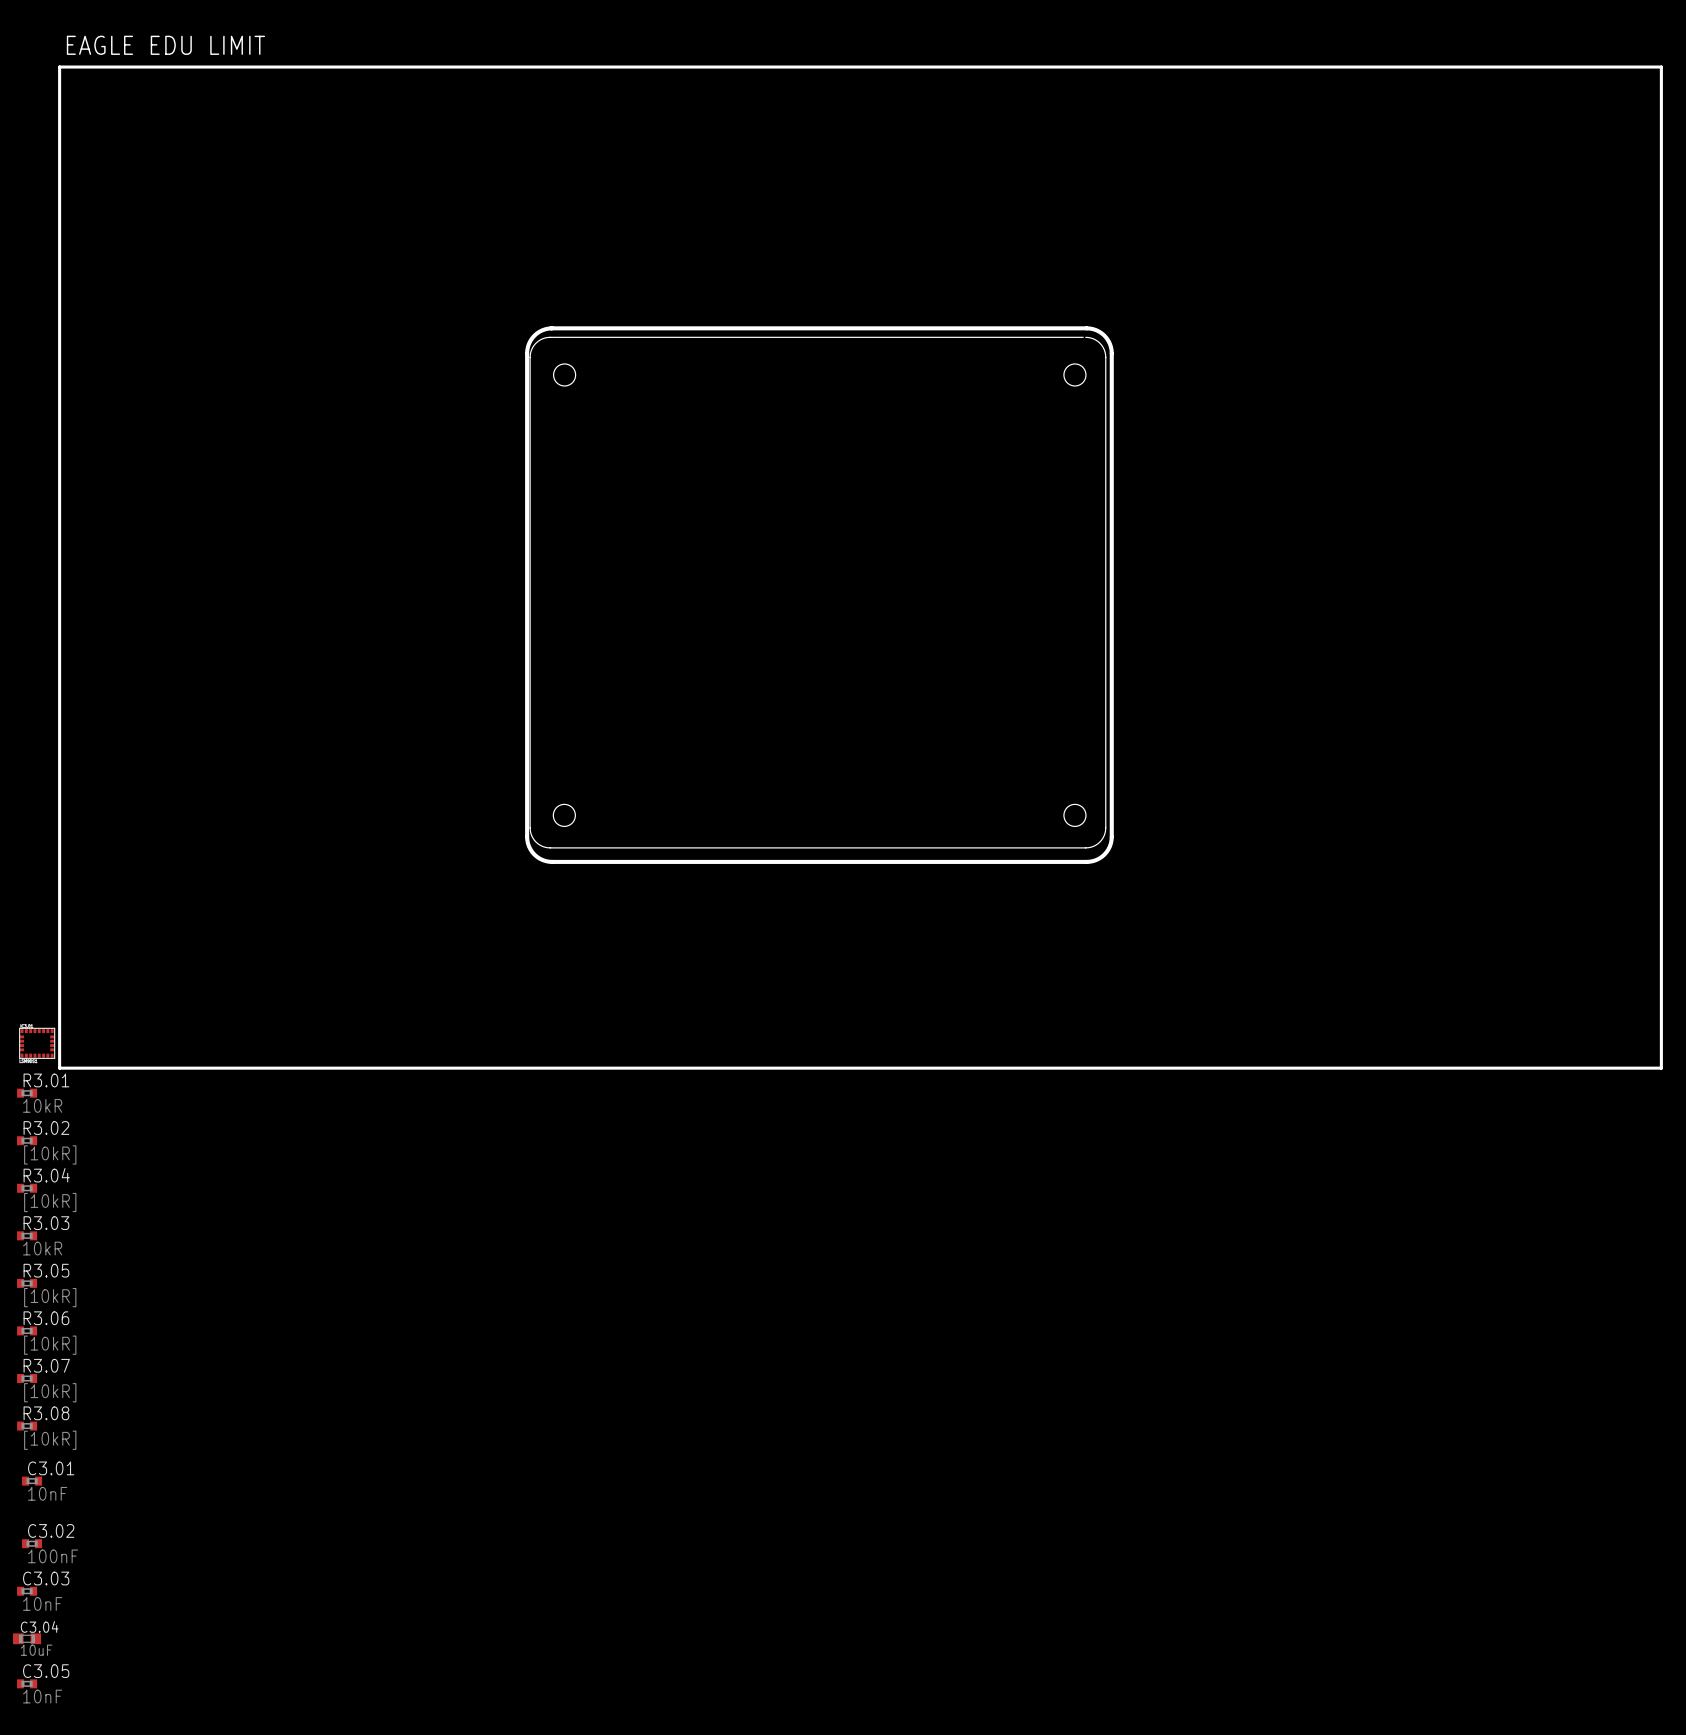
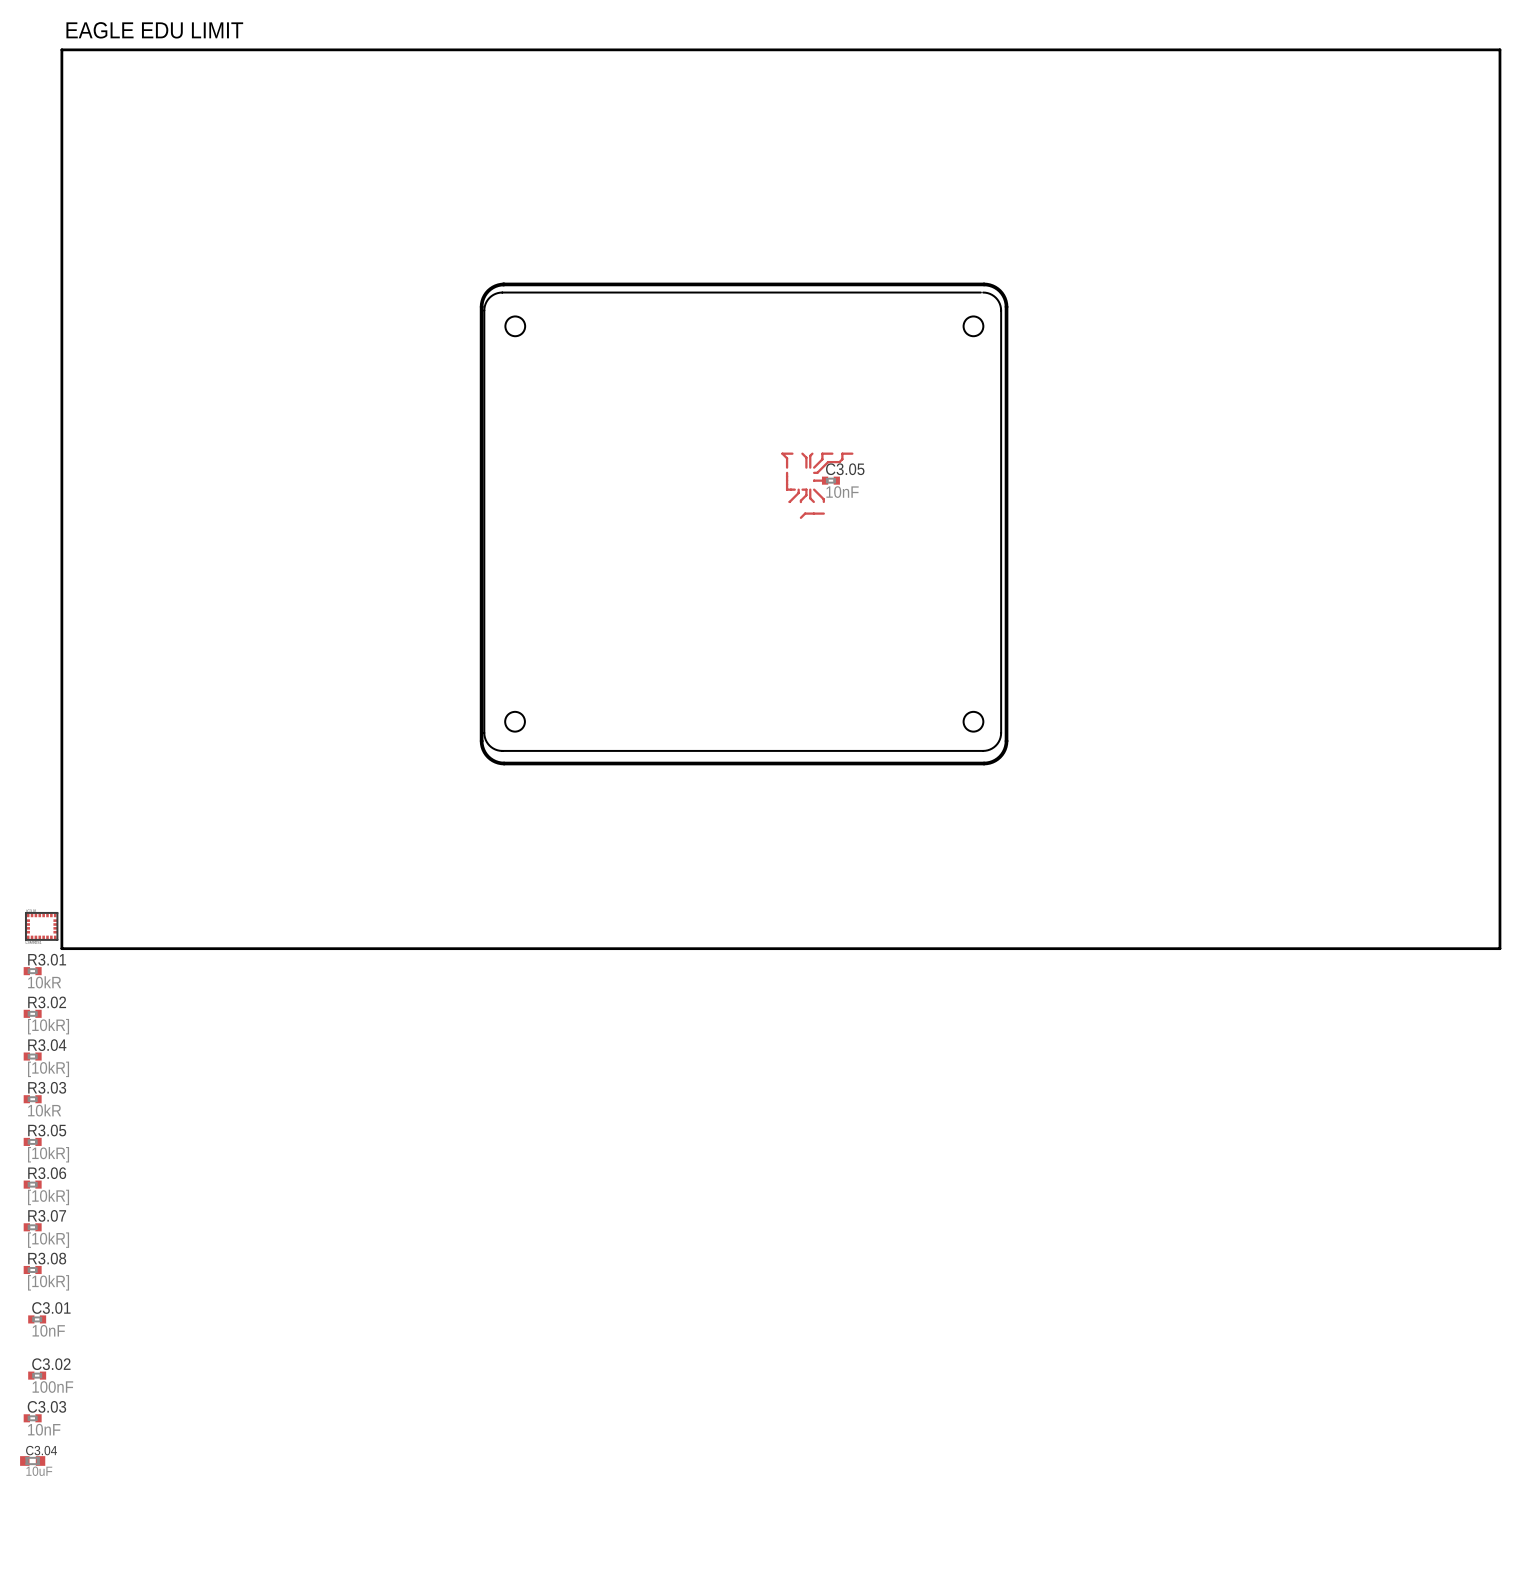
top track: none -> (792, 453) (782, 453) (787, 458) (787, 467)
top track: none -> (802, 453) (806, 457) (806, 467)
top track: none -> (812, 453) (810, 455) (810, 467)
top track: none -> (832, 453) (822, 453) (822, 459) (814, 467)
top track: none -> (852, 453) (842, 453) (842, 459) (839, 462) (828, 462) (817, 472) (814, 472)
top track: none -> (787, 472) (787, 489) (794, 489)
top track: none -> (814, 480) (825, 480)
top track: none -> (798, 489) (798, 492) (789, 501)
top track: none -> (802, 489) (806, 489) (806, 495) (800, 502)
top track: none -> (810, 489) (810, 498) (813, 501)
top track: none -> (814, 489) (823, 499) (823, 501)
top track: none -> (823, 513) (805, 513) (800, 517)
C3.05 position: (27, 1683) -> (830, 480)

